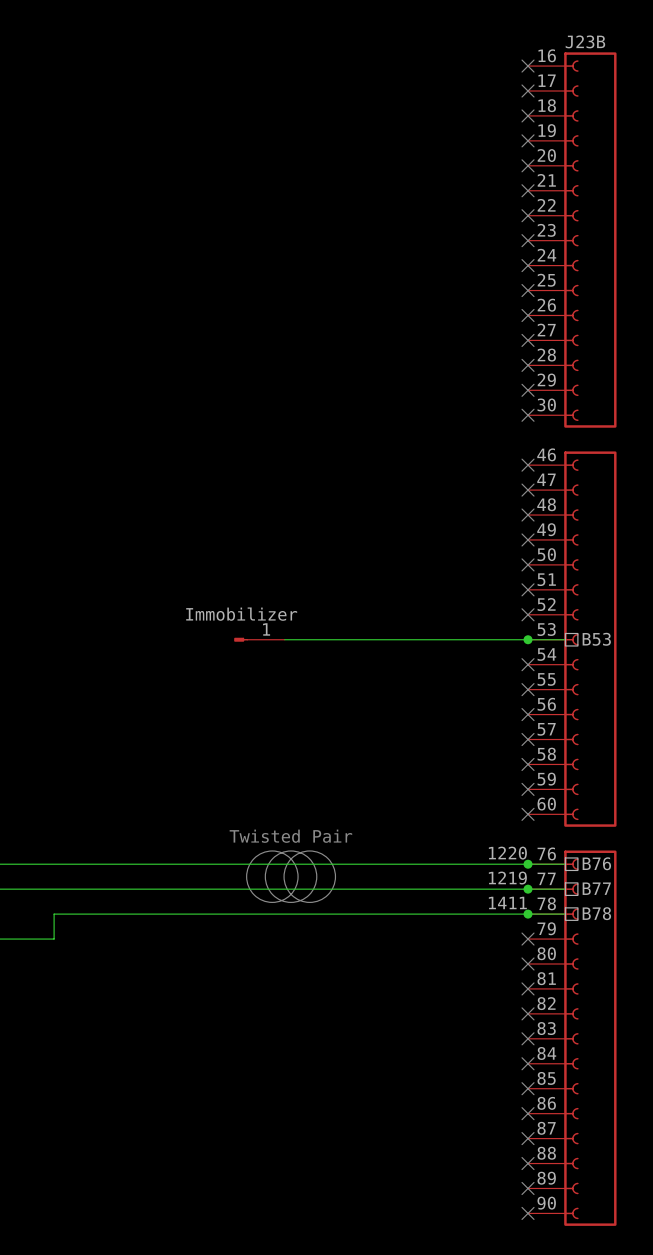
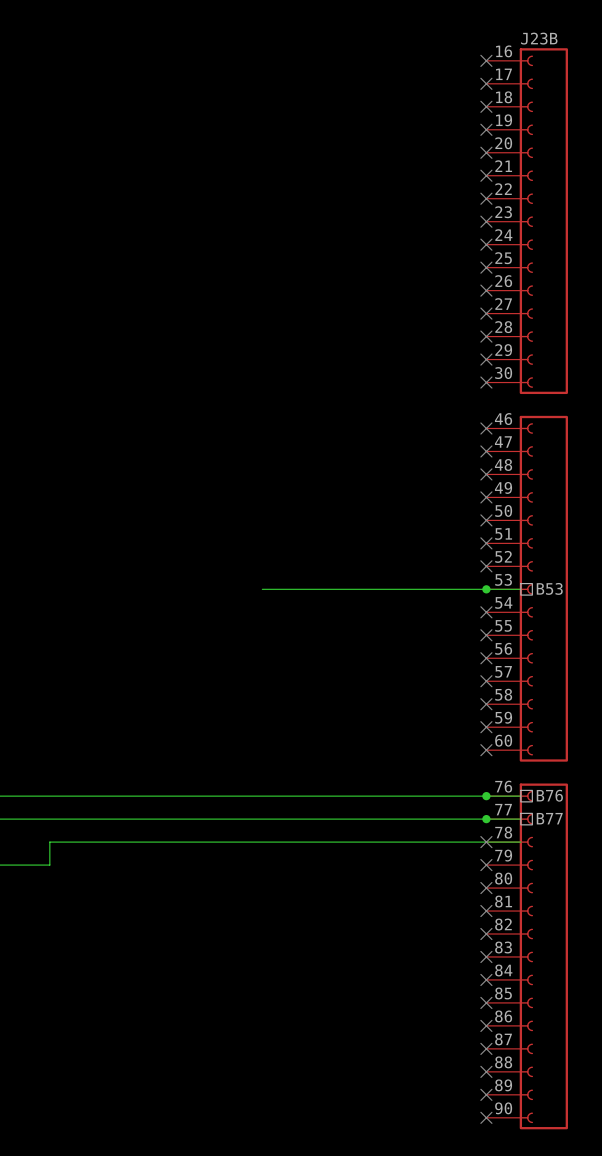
part: Immobilizer (259, 639) -> none
text: Twisted Pair (290, 836) -> none
drawing: [246, 850, 336, 903] -> none
label: 1220 (507, 853) -> none
label: 1219 (507, 878) -> none
label: 1411 (507, 902) -> none
hierarchical label: B78 (596, 913) -> none
junction: (528, 914) -> none
no-connect mark: none -> (486, 842)

